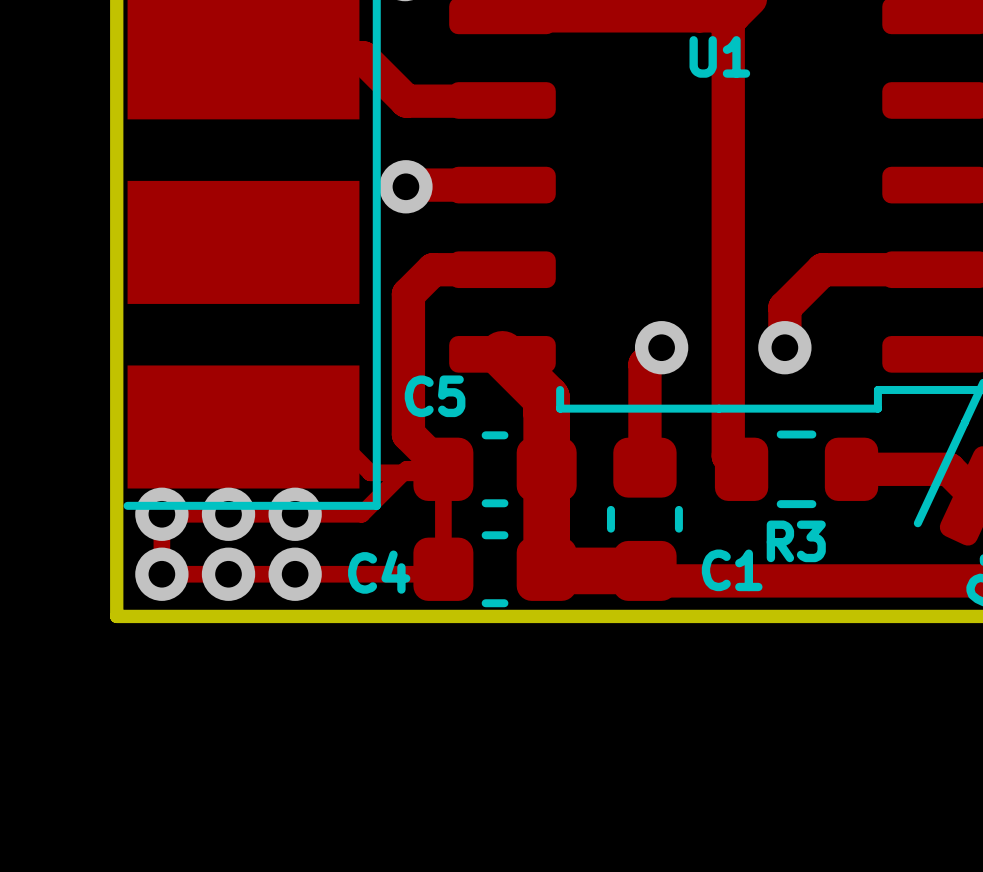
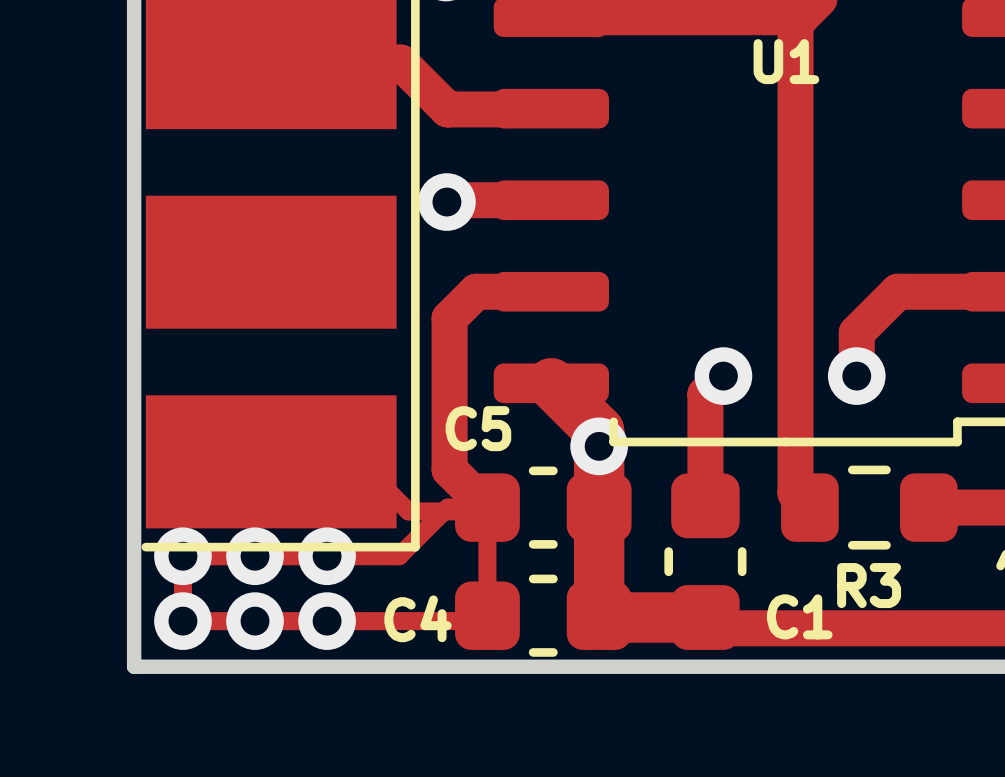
via: none -> (599, 446)

